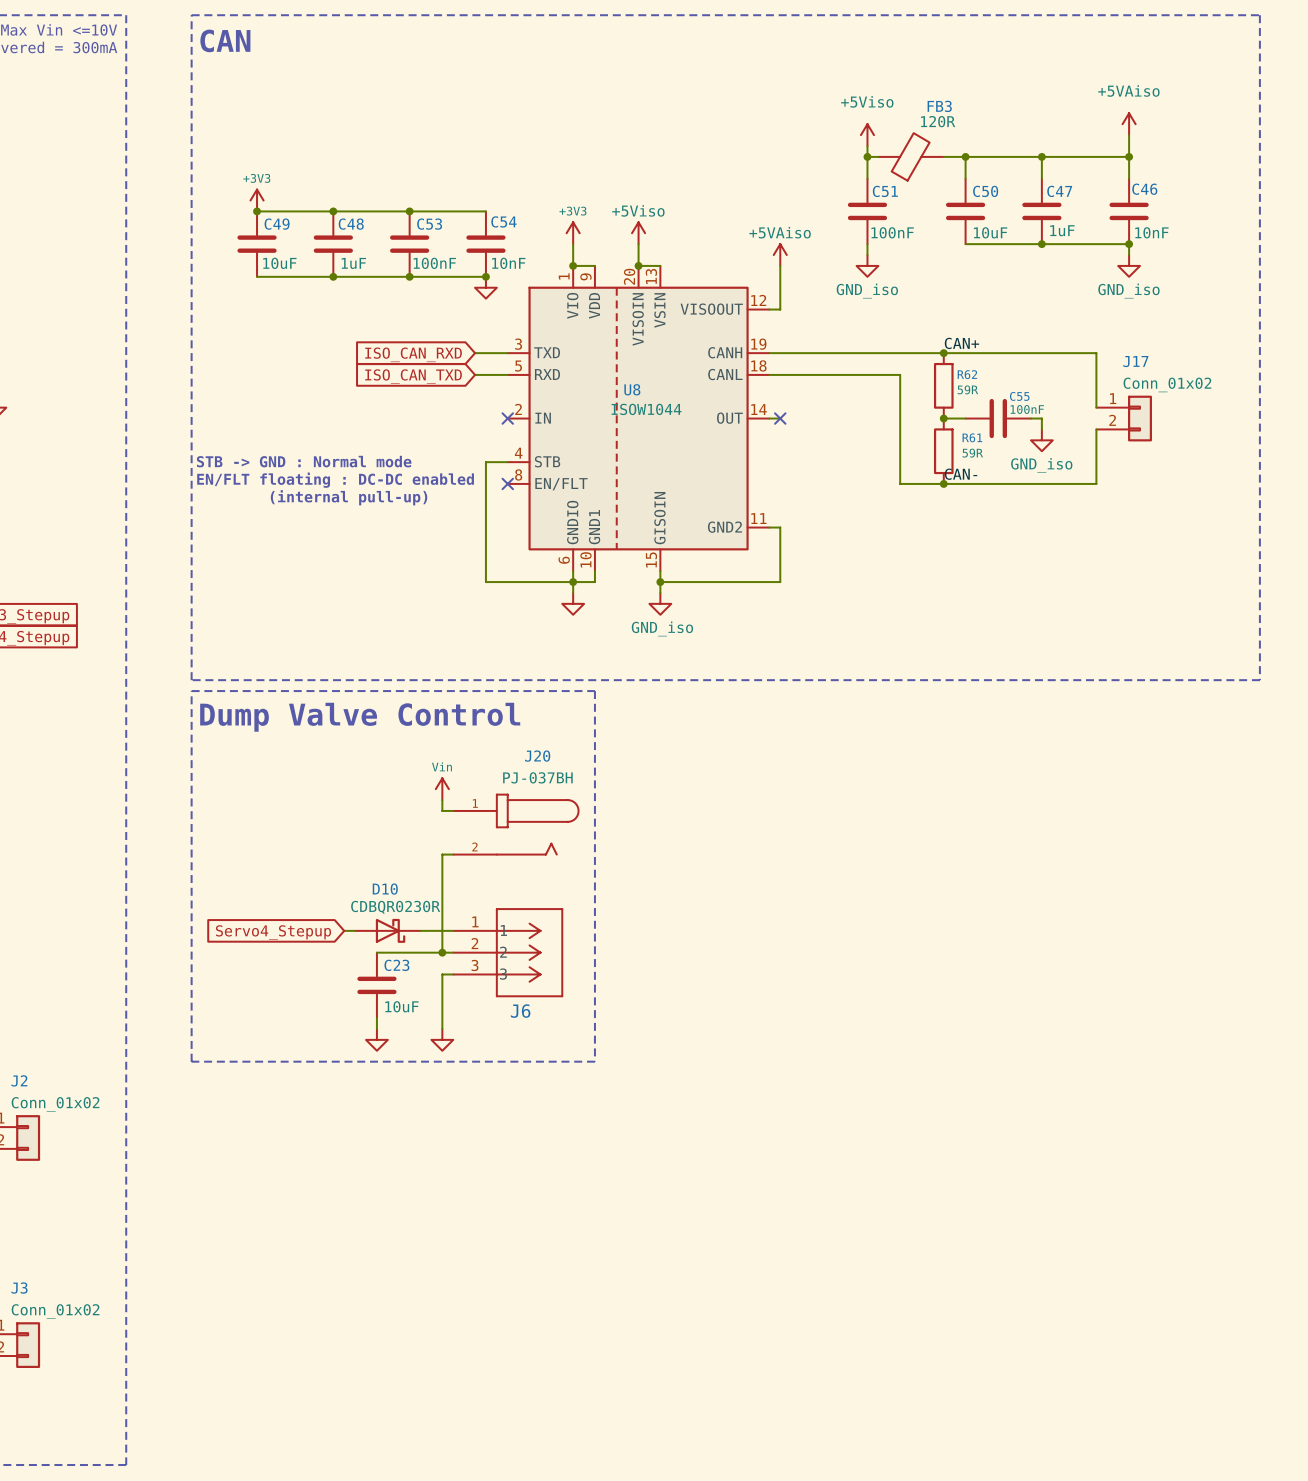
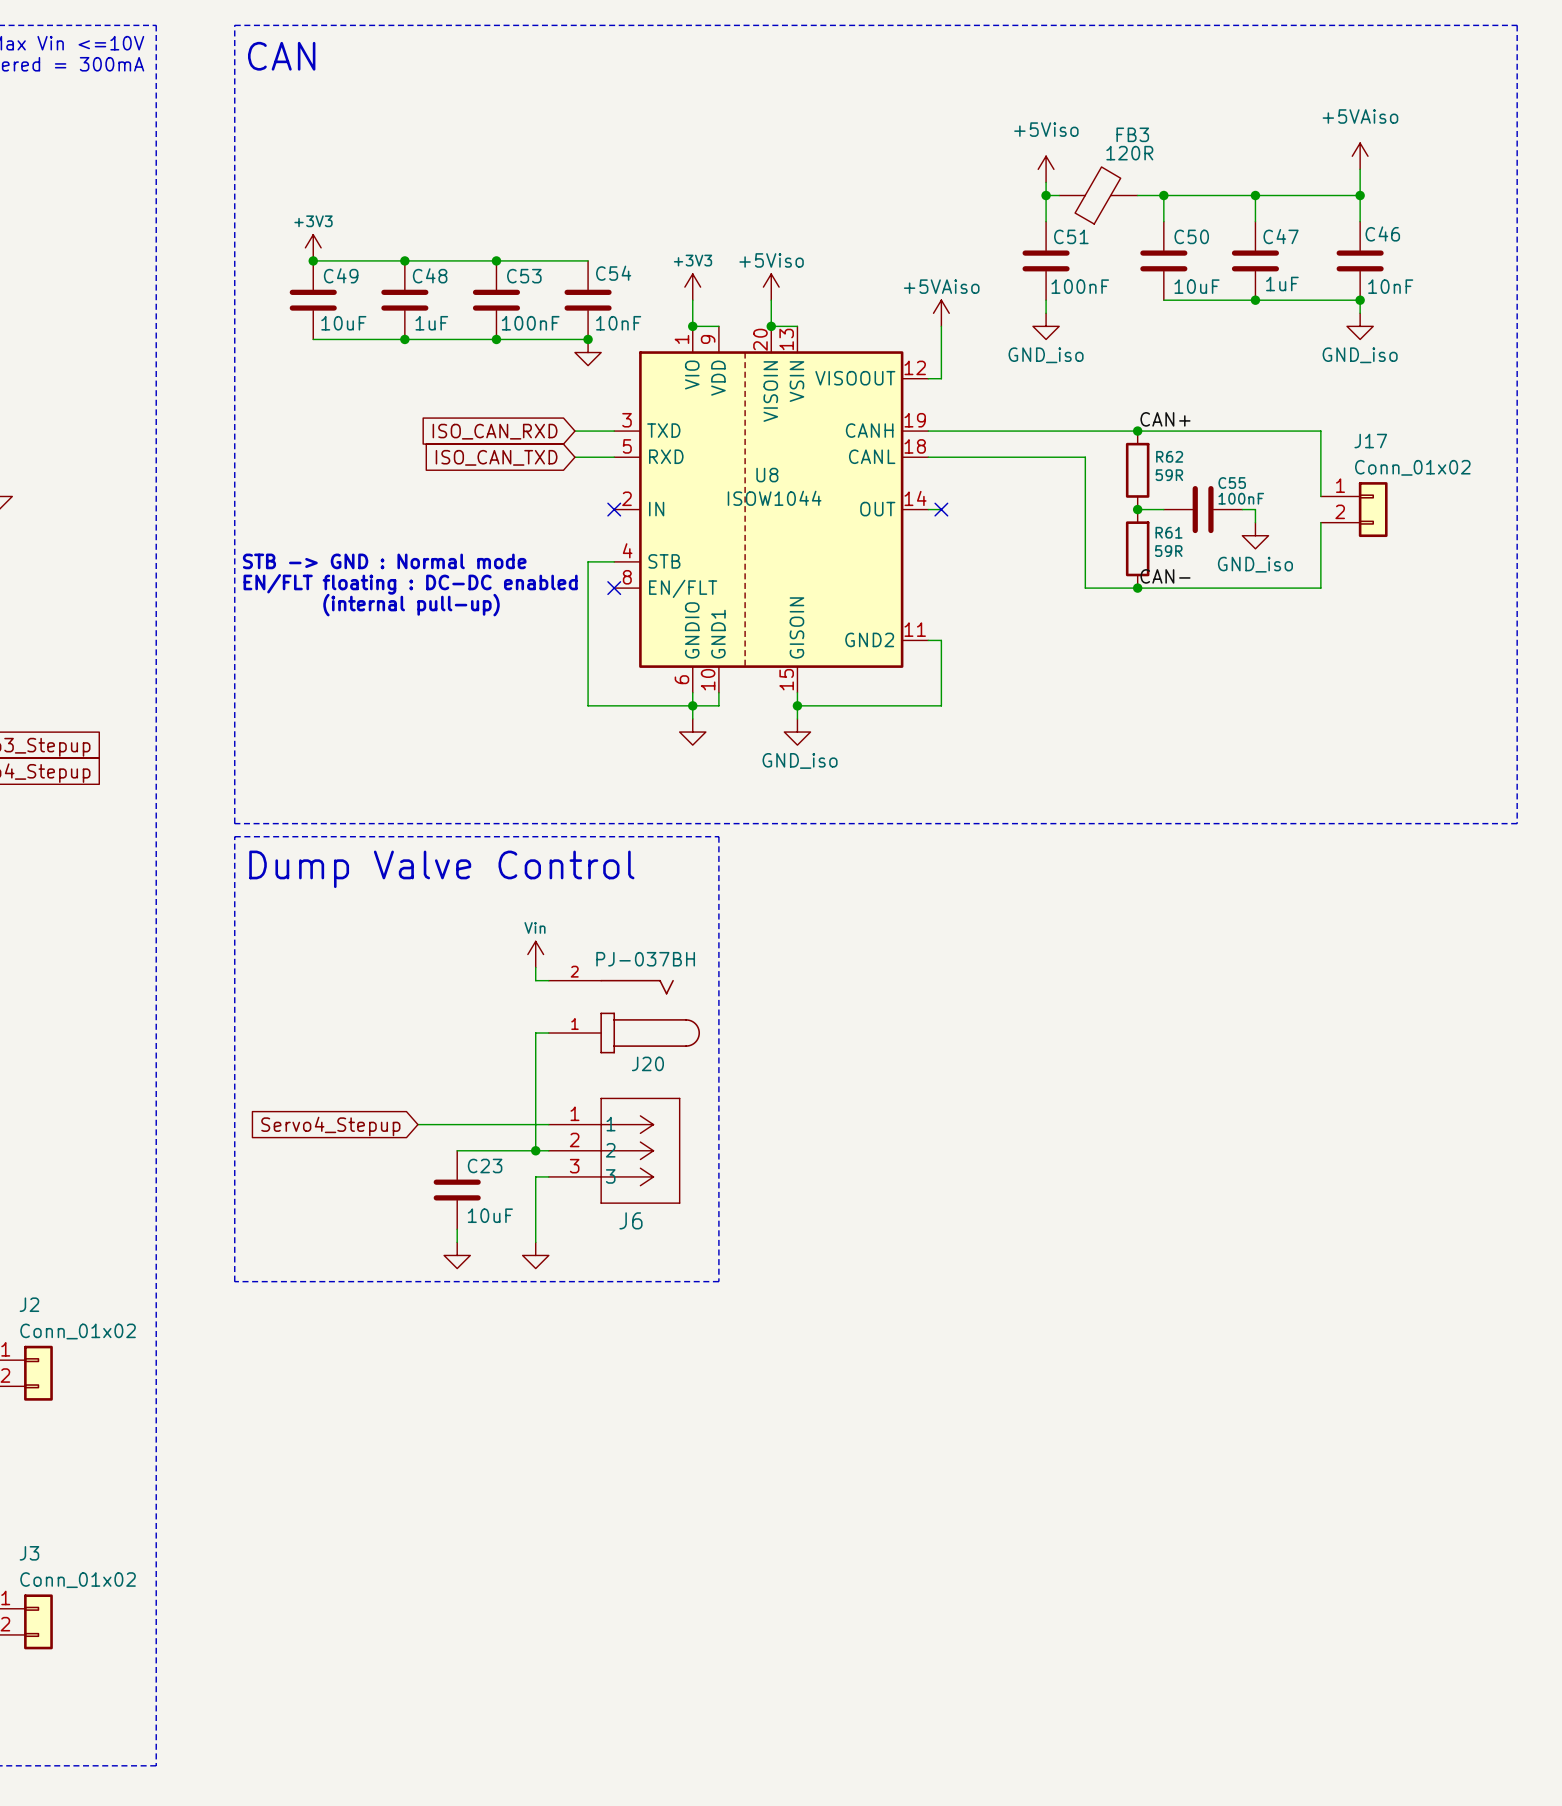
J20 name position: J20 (537, 756) -> J20 (647, 1063)
J20 flip: as is (537, 824) -> up-down (650, 1016)
D10: CDBQR0230R (387, 930) -> none

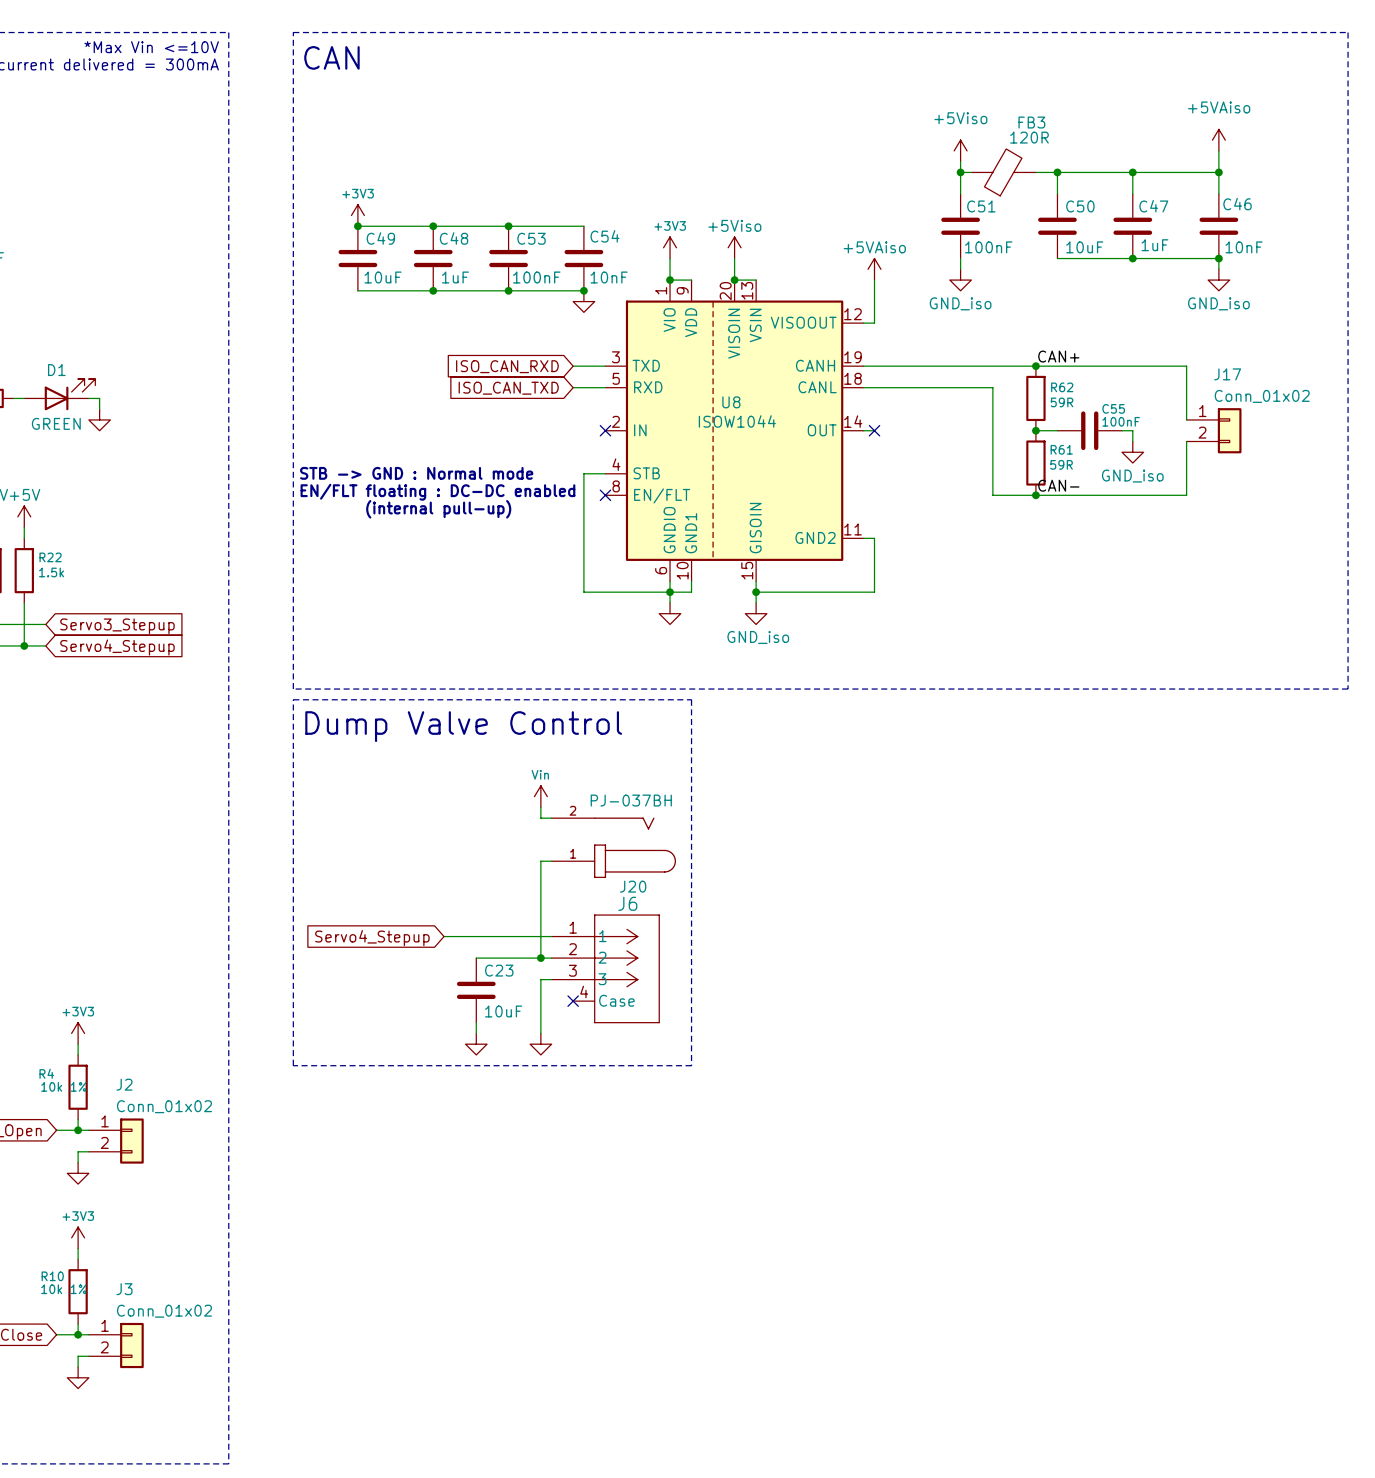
J6 symbol: [548, 1097, 681, 1204] -> [551, 914, 660, 1024]
no-connect mark: none -> (573, 1001)
J6 name position: J6 (630, 1220) -> J6 (627, 903)

